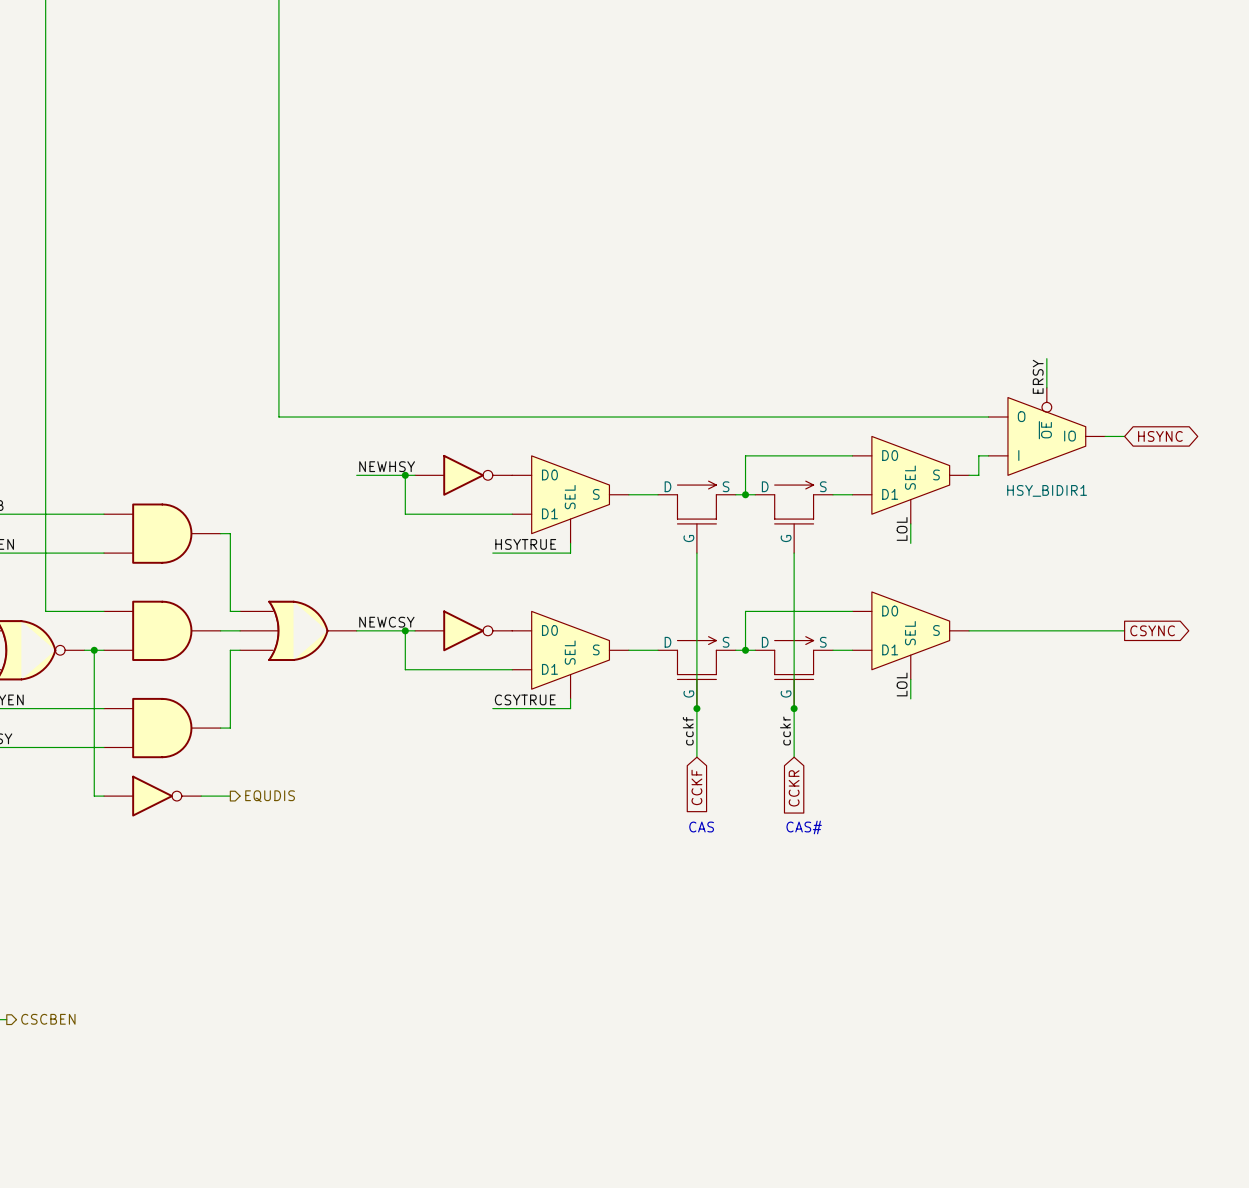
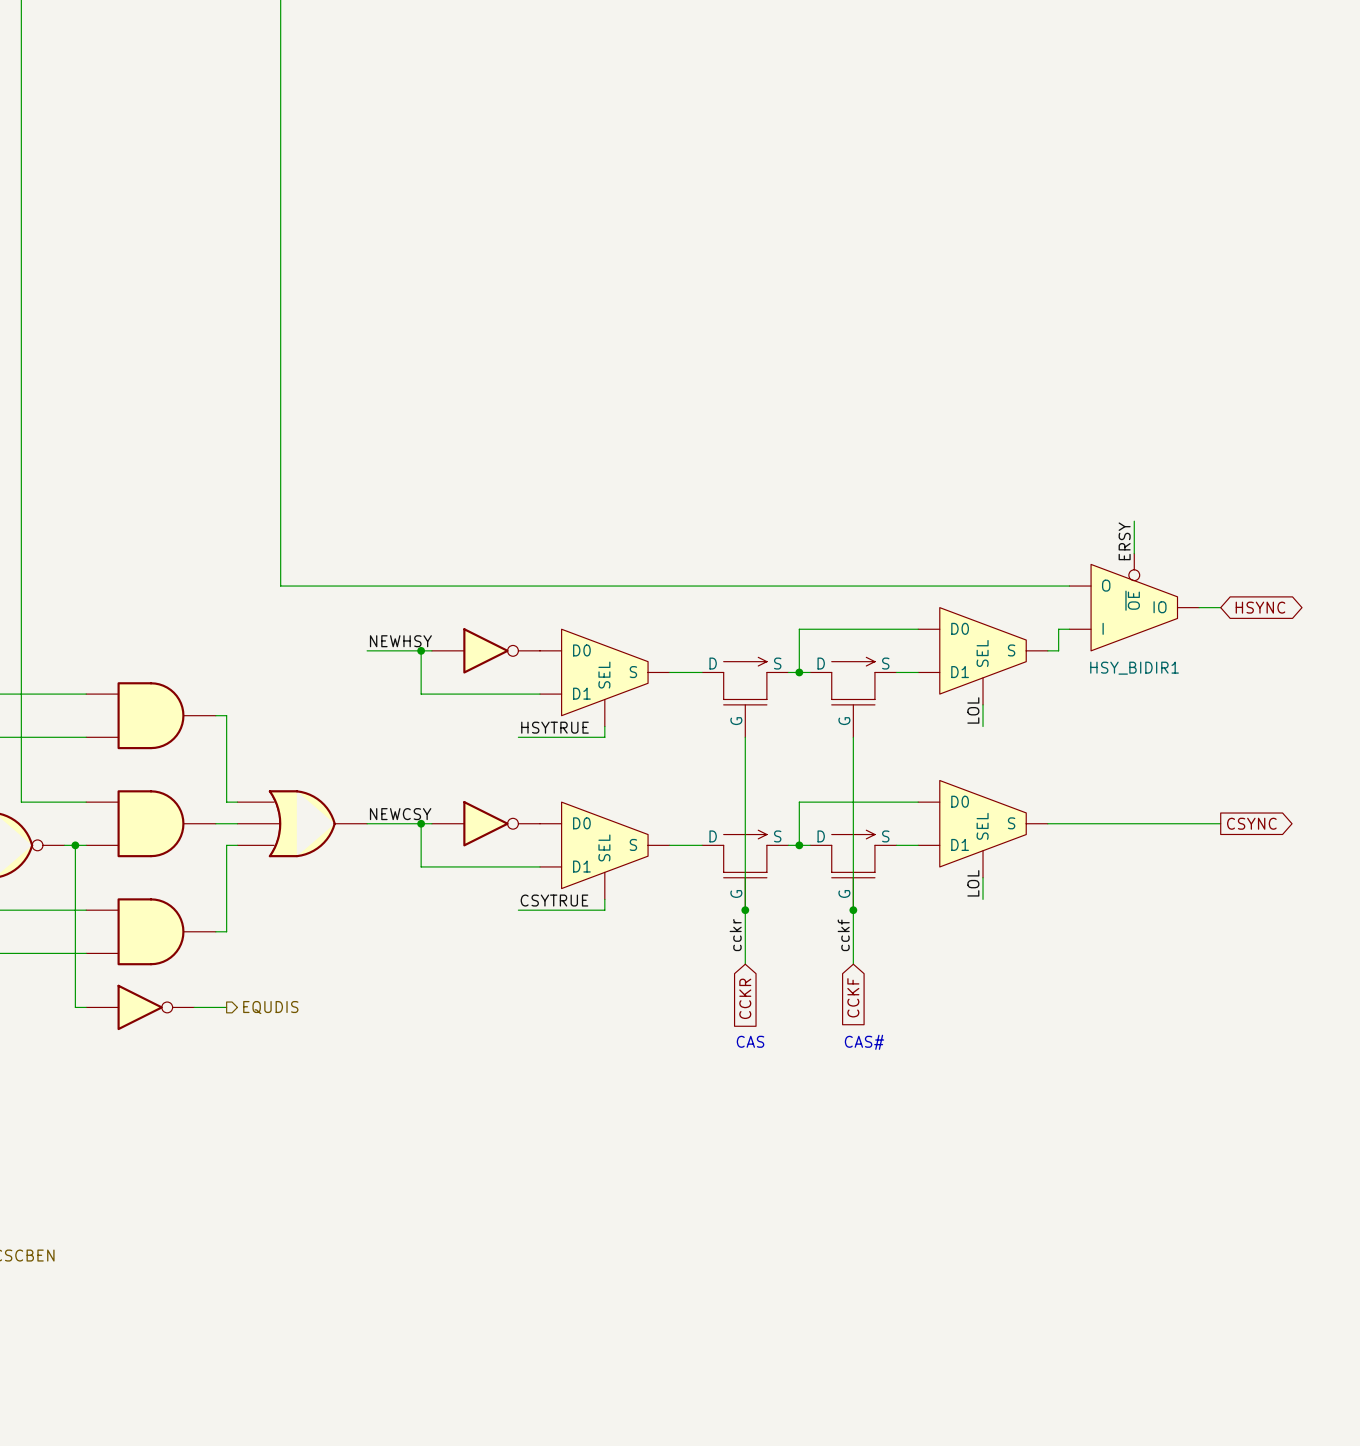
label: cckr (785, 730) -> cckf (843, 935)
label: cckf (688, 731) -> cckr (735, 935)
global label: CCKF (696, 787) -> CCKR (745, 998)
global label: CCKR (794, 788) -> CCKF (853, 997)

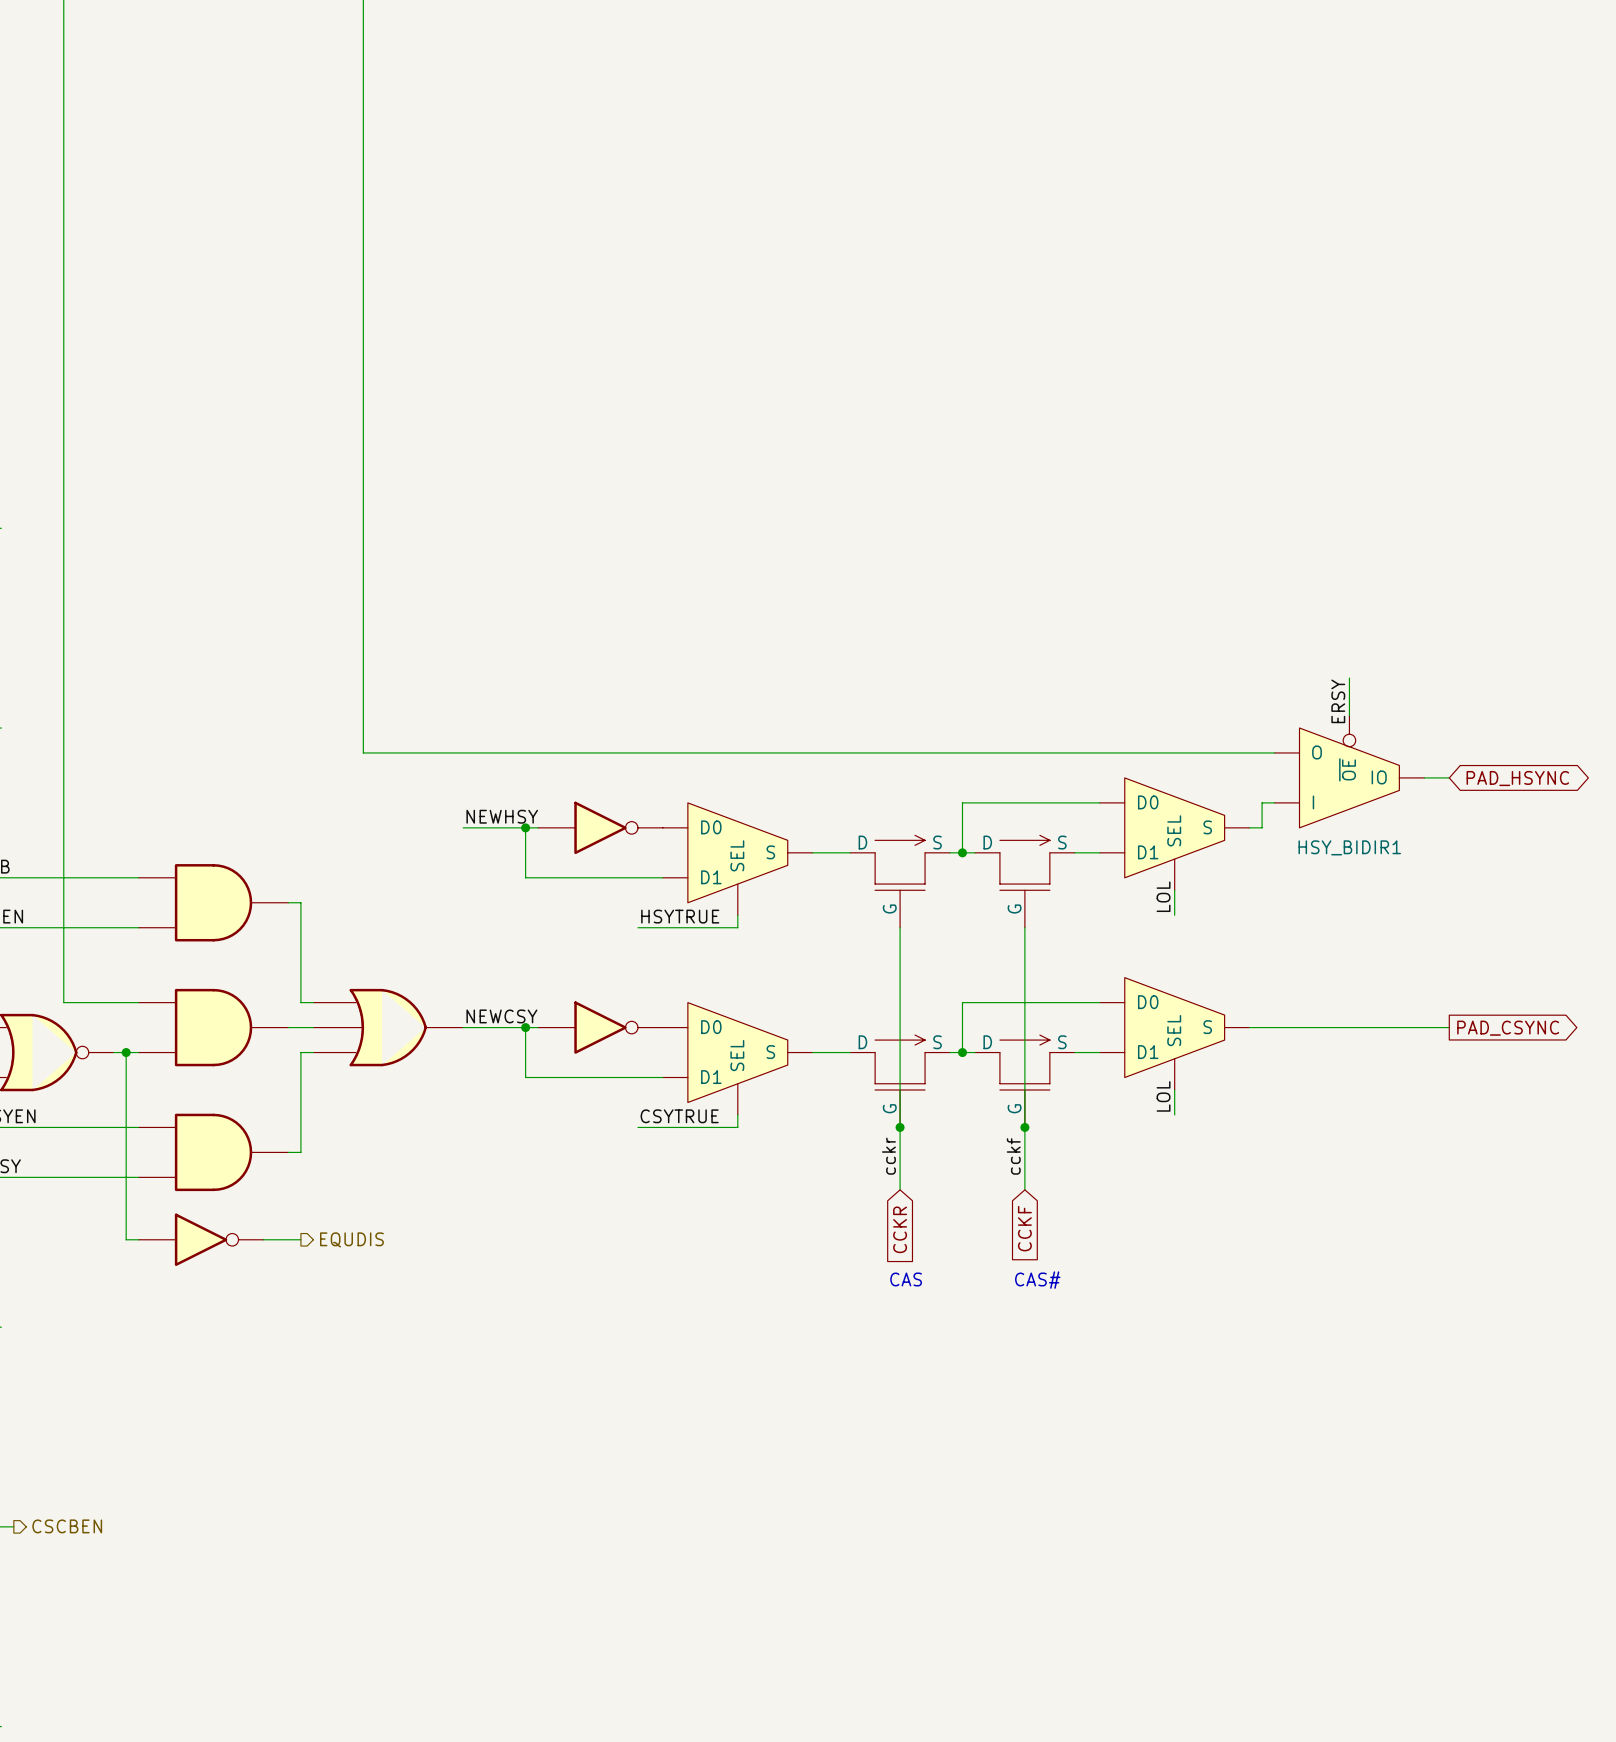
global label: HSYNC (1260, 607) -> PAD_HSYNC (1517, 778)
global label: CSYNC (1251, 823) -> PAD_CSYNC (1508, 1028)

